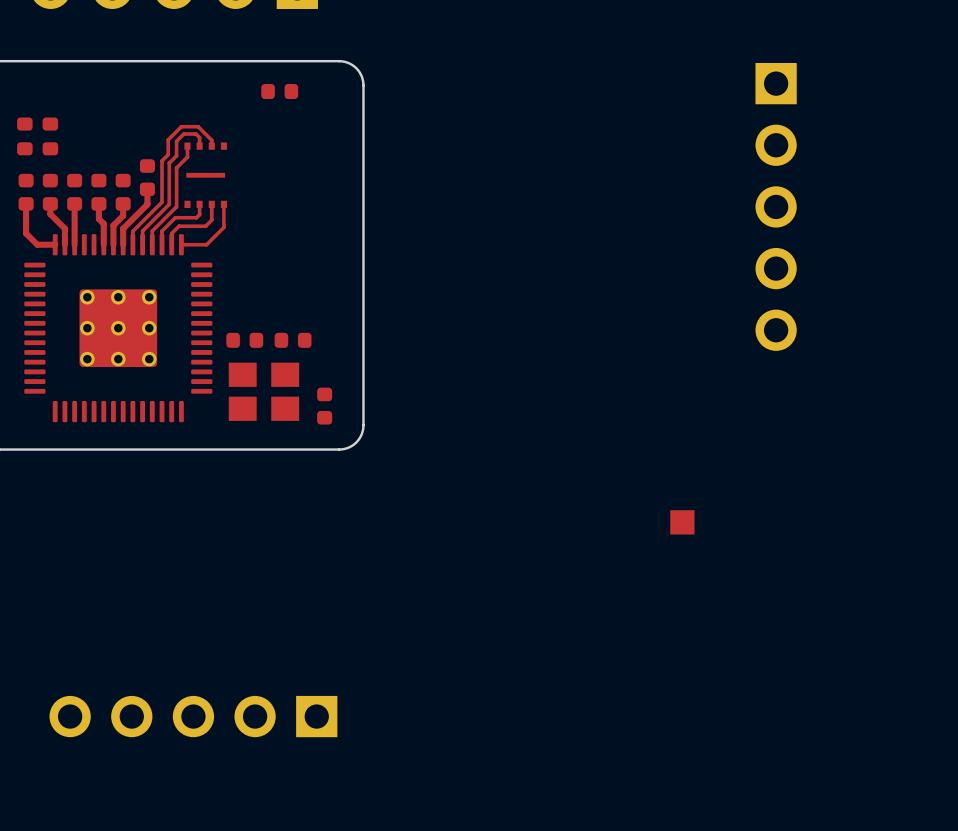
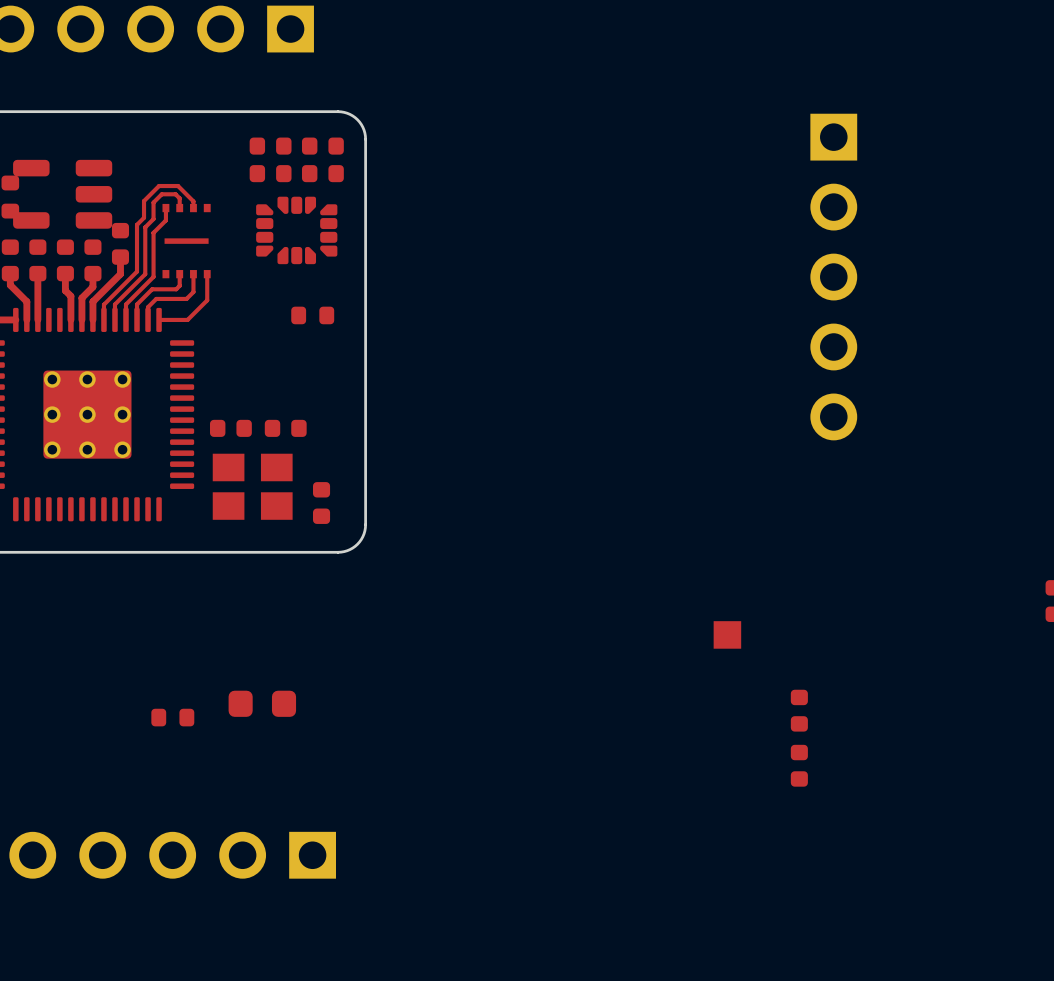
part: none -> (322, 146)
part: none -> (270, 173)
part: none -> (322, 173)
part: none -> (62, 194)
part: none -> (296, 230)
part: none -> (312, 315)
part: none -> (262, 703)
part: none -> (799, 710)
part: none -> (172, 717)
part: none -> (799, 765)

